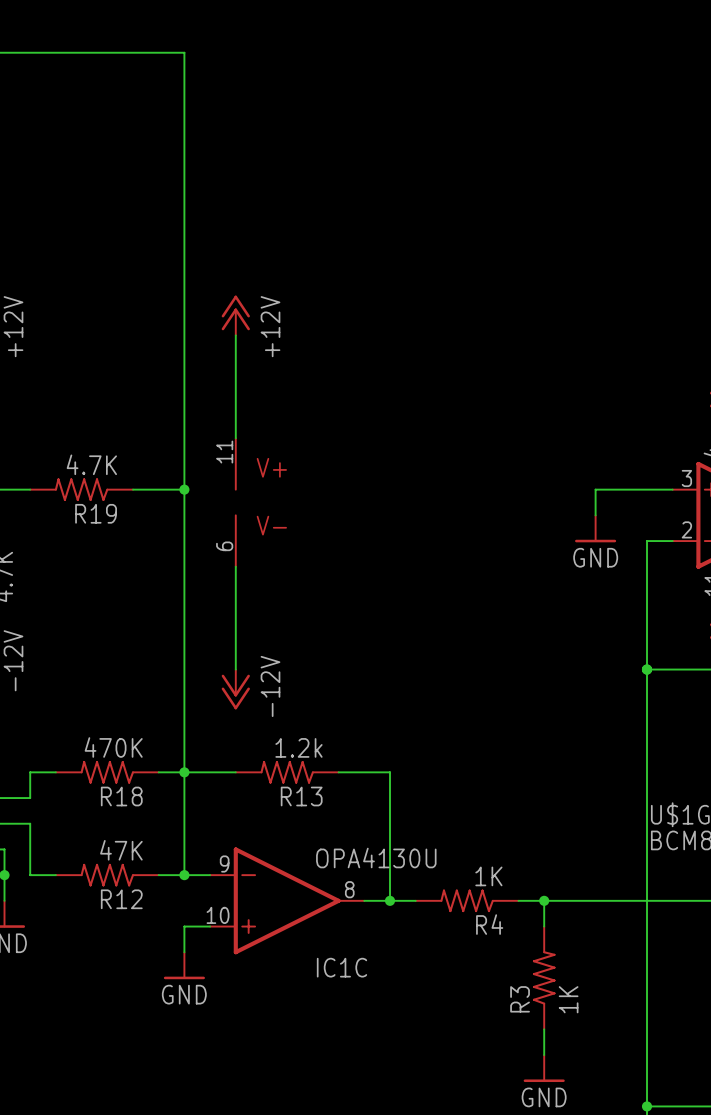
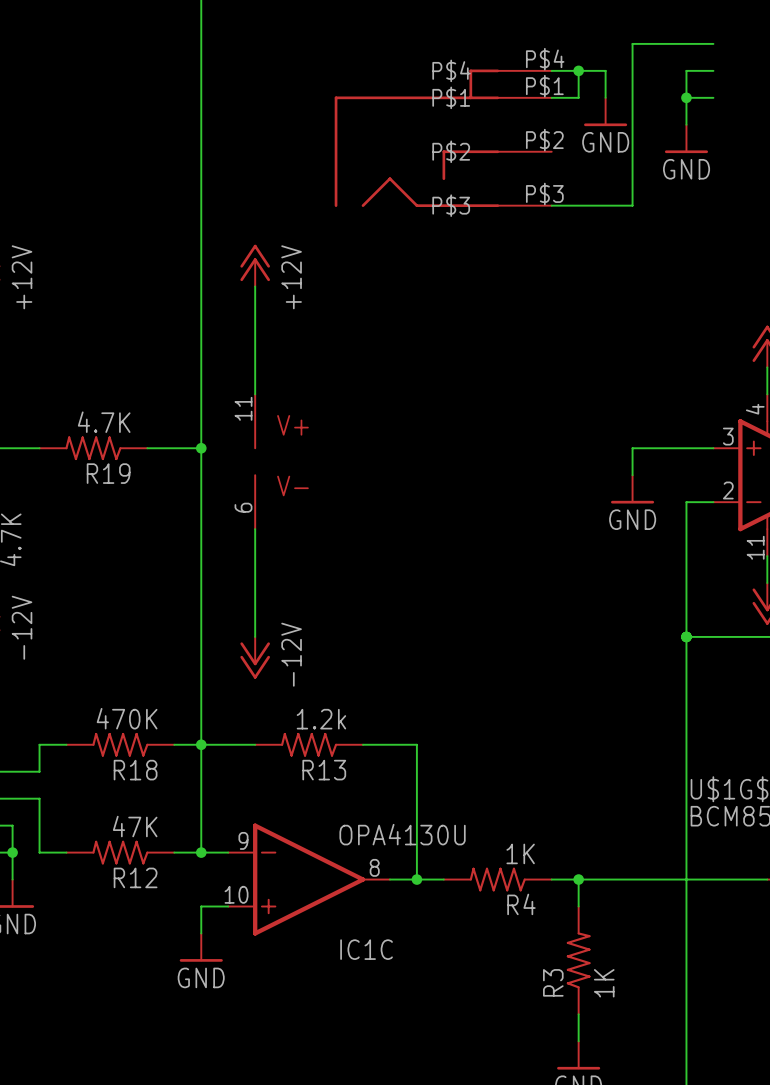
wire: none -> (713, 43) (632, 43) (632, 205) (551, 205)
wire: none -> (551, 70) (605, 70) (605, 97)
wire: none -> (578, 70) (578, 97) (551, 97)
junction: none -> (578, 70)
wire: none -> (713, 70) (686, 70) (686, 124)
wire: none -> (686, 97) (713, 97)
junction: none -> (686, 97)
power symbol: none -> GND (605, 111)
part: none -> (443, 138)
power symbol: none -> GND (686, 138)

